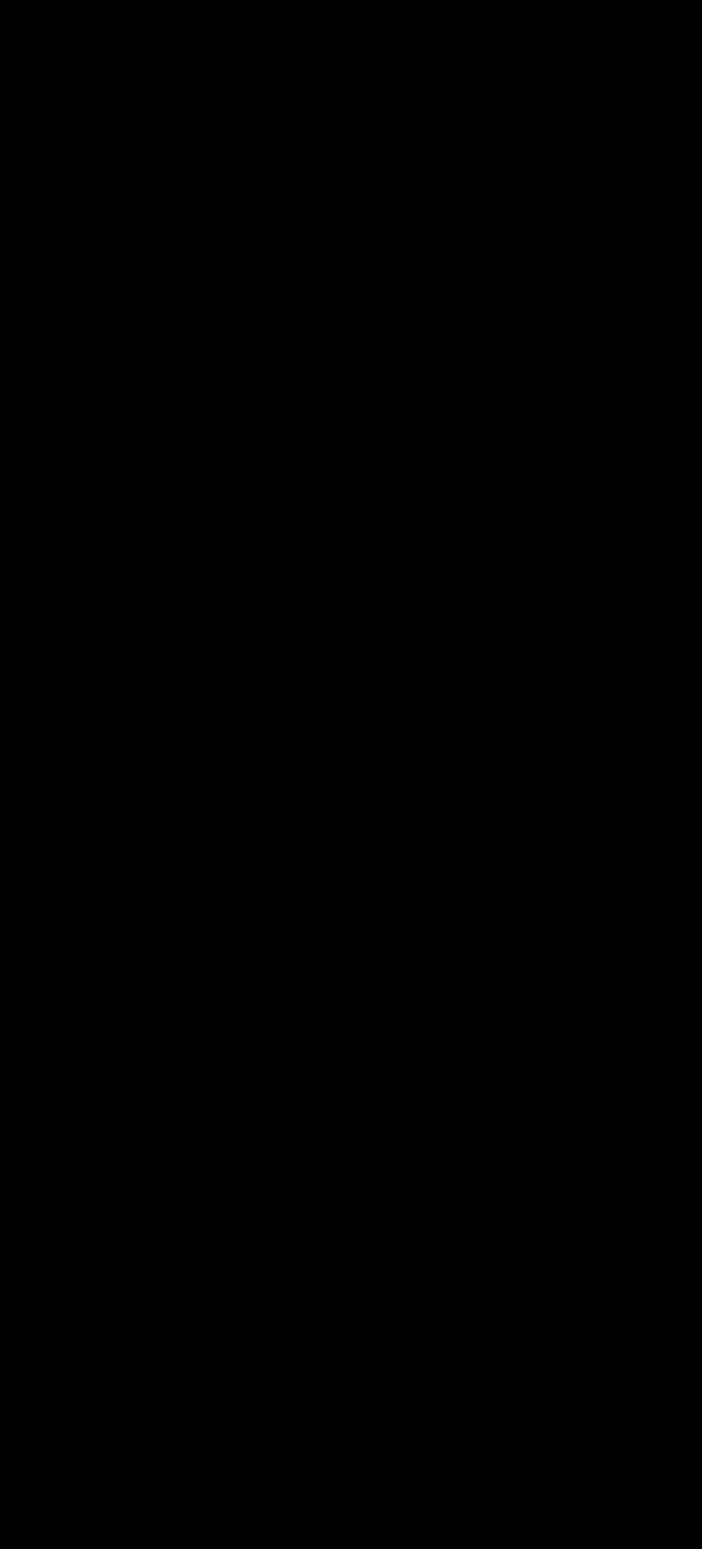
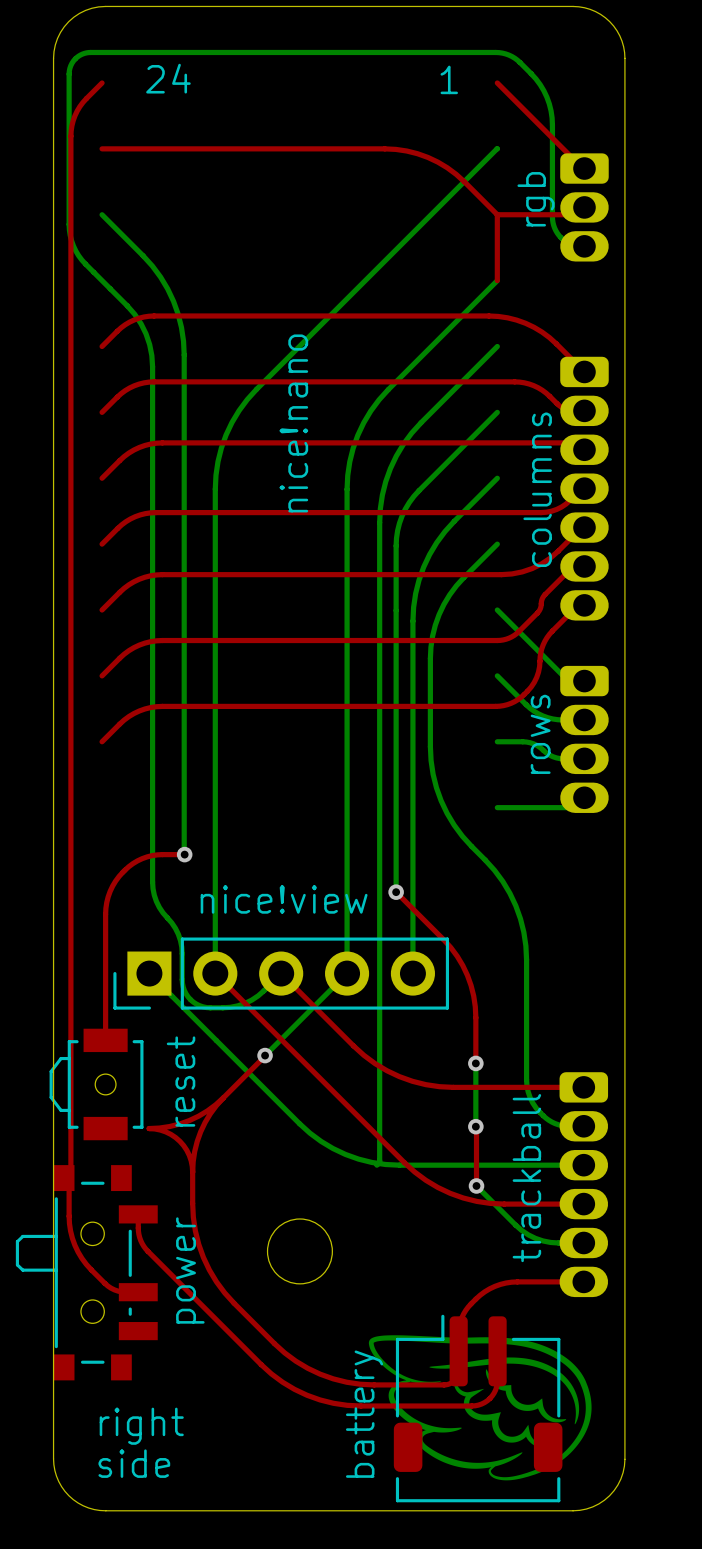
board edge: none -> (105, 6) (578, 6) (595, 11) (605, 17) (616, 30) (622, 41) (624, 58) (624, 1459) (623, 1472) (614, 1490) (604, 1500) (586, 1509) (573, 1510) (100, 1510) (83, 1505) (73, 1499) (61, 1486) (56, 1476) (53, 1458) (53, 58) (57, 38) (68, 21) (85, 10) (105, 6)
text: none -> 24 (168, 78)
text: none -> 1 (449, 79)
top track: none -> (102, 82) (77, 111) (73, 120) (70, 136) (70, 1175) (69, 1179) (69, 1216) (74, 1245) (91, 1269) (114, 1289) (138, 1292)
top track: none -> (497, 82) (584, 168)
top track: none -> (102, 148) (384, 148) (406, 151) (427, 157) (447, 167) (497, 214)
bottom track: none -> (497, 148) (256, 389) (231, 422) (221, 448) (215, 489) (215, 973)
text: none -> rgb (536, 199)
top track: none -> (584, 207) (573, 214) (497, 214)
part: none -> (584, 207)
bottom track: none -> (102, 214) (143, 255) (160, 277) (178, 314) (183, 341) (184, 854)
top track: none -> (497, 214) (497, 280)
bottom track: none -> (584, 246) (572, 245) (566, 242) (557, 233) (553, 225) (552, 117) (546, 97) (531, 73) (517, 60) (505, 53) (90, 52) (78, 56) (70, 65) (69, 74) (69, 224) (71, 240) (81, 260) (134, 314) (146, 333) (151, 355) (152, 882) (154, 895) (159, 907) (178, 934) (181, 947) (183, 986) (188, 996) (196, 1004) (206, 1007) (222, 1007) (245, 1003) (258, 995) (281, 973)
bottom track: none -> (497, 280) (379, 399) (363, 422) (353, 448) (347, 489) (347, 973) (265, 1055)
top track: none -> (102, 346) (125, 324) (149, 316) (498, 316) (516, 320) (542, 332) (584, 371)
bottom track: none -> (497, 346) (421, 422) (403, 444) (385, 481) (380, 508) (379, 1160) (376, 1165)
top track: none -> (584, 410) (564, 408) (538, 387) (519, 382) (154, 381) (129, 388) (102, 412)
bottom track: none -> (497, 412) (413, 496) (402, 516) (397, 530) (396, 892)
text: none -> nice!nano (293, 423)
top track: none -> (584, 449) (578, 444) (572, 442) (156, 443) (144, 445) (128, 453) (102, 478)
bottom track: none -> (497, 478) (454, 521) (436, 542) (423, 567) (415, 593) (412, 621) (412, 973)
top track: none -> (584, 488) (581, 489) (561, 507) (541, 512) (150, 512) (140, 514) (125, 521) (102, 544)
part: none -> (584, 488)
text: none -> columns (537, 489)
top track: none -> (584, 527) (581, 528) (558, 551) (541, 563) (511, 573) (156, 574) (139, 579) (128, 584) (102, 610)
bottom track: none -> (497, 544) (456, 585) (443, 604) (435, 625) (430, 658) (430, 746) (433, 774) (441, 800) (454, 825) (502, 881) (520, 918) (525, 946) (526, 1079) (530, 1097) (540, 1112) (551, 1122) (565, 1126) (583, 1126)
top track: none -> (584, 566) (575, 566) (569, 570) (543, 595) (537, 613) (516, 633) (503, 639) (156, 640) (144, 643) (128, 650) (102, 675)
top track: none -> (584, 605) (576, 607) (549, 634) (541, 648) (538, 672) (534, 682) (521, 697) (507, 704) (495, 706) (156, 706) (144, 709) (128, 716) (102, 741)
bottom track: none -> (497, 610) (564, 676) (572, 680) (584, 681)
bottom track: none -> (497, 675) (526, 704) (538, 713) (557, 719) (584, 719)
text: none -> rows (540, 734)
part: none -> (584, 739)
bottom track: none -> (497, 741) (526, 742) (537, 745) (556, 757) (584, 758)
bottom track: none -> (584, 797) (576, 805) (569, 807) (497, 807)
top track: none -> (184, 854) (157, 854) (137, 860) (119, 876) (110, 891) (105, 914) (105, 1040)
via: none -> (184, 854)
top track: none -> (396, 892) (450, 947) (467, 975) (475, 1006) (475, 1063)
via: none -> (396, 892)
text: none -> nice!view (284, 899)
top track: none -> (215, 973) (404, 1162) (425, 1180) (450, 1193) (476, 1201) (504, 1204) (583, 1204)
top track: none -> (281, 973) (363, 1055) (399, 1076) (439, 1086) (583, 1087)
part: none -> (281, 973)
bottom track: none -> (149, 980) (149, 976) (151, 975) (309, 1133) (345, 1154) (371, 1162) (399, 1165) (583, 1165)
top track: none -> (265, 1055) (223, 1097)
via: none -> (265, 1055)
bottom track: none -> (475, 1063) (475, 1126)
via: none -> (475, 1063)
text: none -> reset (181, 1081)
part: none -> (96, 1084)
top track: none -> (223, 1097) (210, 1113) (200, 1131) (194, 1151) (192, 1172)
top track: none -> (223, 1097) (207, 1110) (189, 1120) (169, 1126) (149, 1128) (165, 1131) (179, 1141) (189, 1155) (192, 1172)
via: none -> (475, 1126)
top track: none -> (476, 1127) (476, 1185)
text: none -> trackball (526, 1178)
top track: none -> (192, 1172) (195, 1230) (203, 1257) (216, 1281) (234, 1303) (284, 1352) (307, 1368) (333, 1378) (374, 1384) (449, 1383) (455, 1379) (458, 1372) (460, 1321) (468, 1307) (480, 1295) (494, 1286) (511, 1282) (583, 1281)
part: none -> (583, 1184)
bottom track: none -> (476, 1185) (515, 1225) (528, 1234) (550, 1242) (583, 1242)
via: none -> (476, 1185)
top track: none -> (138, 1214) (139, 1237) (147, 1251) (271, 1373) (307, 1395) (347, 1405) (478, 1405) (490, 1398) (495, 1390) (497, 1351)
round board edge: none -> [267, 1218, 333, 1285]
part: none -> (86, 1272)
text: none -> power (190, 1270)
drawing: none -> [368, 1335, 592, 1481]
text: none -> battery (364, 1414)
part: none -> (478, 1408)
text: none -> right (141, 1426)
text: none -> side (134, 1463)

